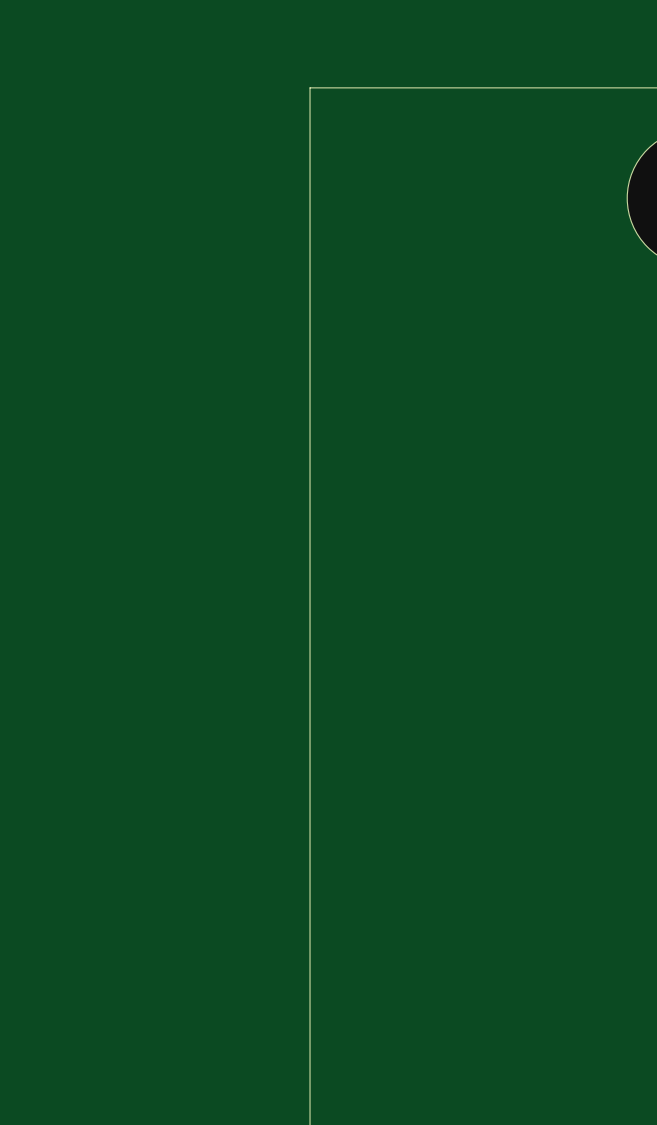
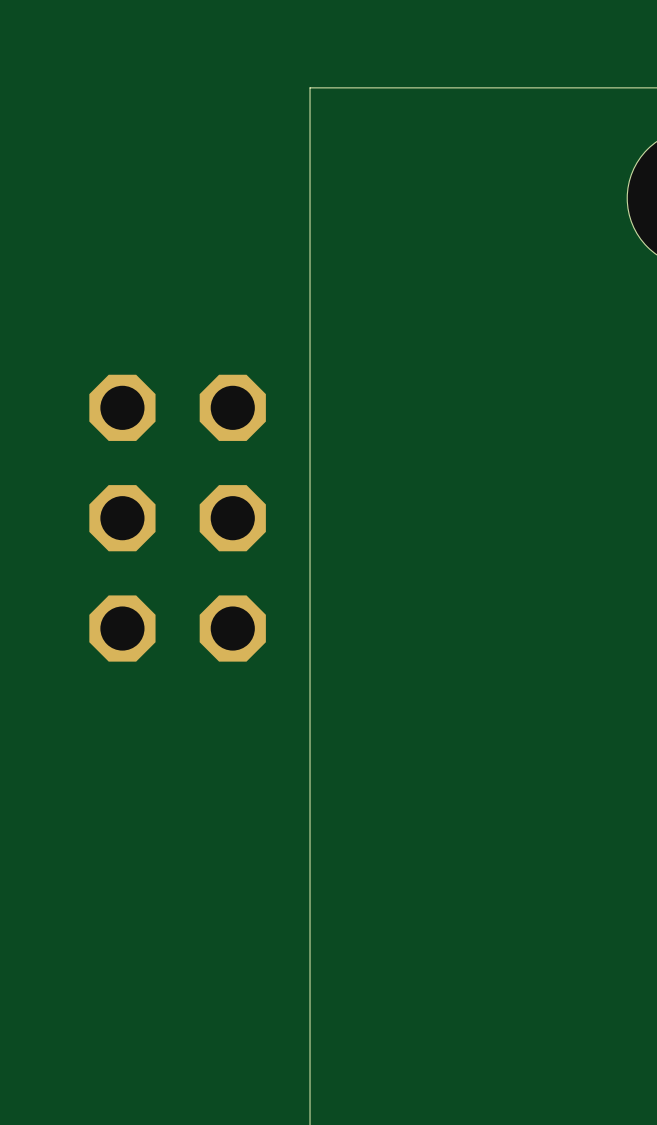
part: none -> (177, 518)

